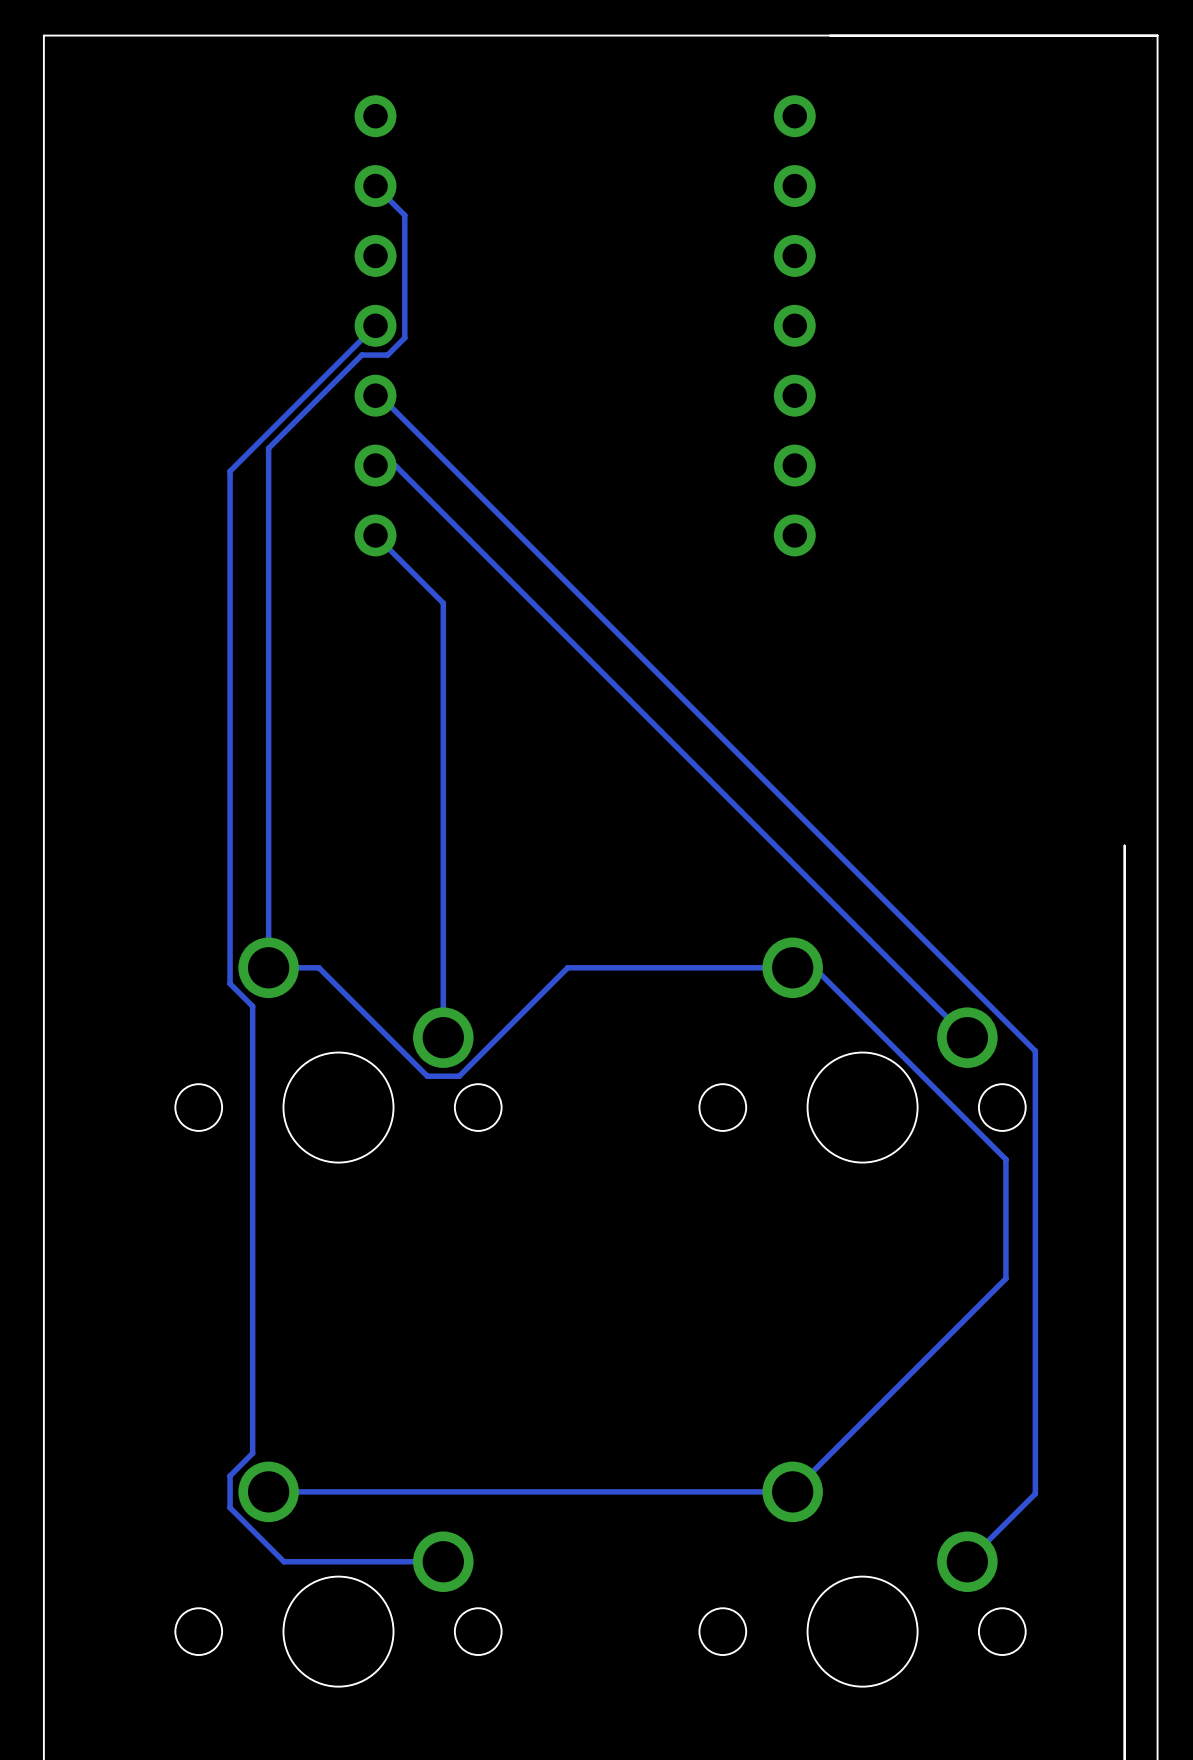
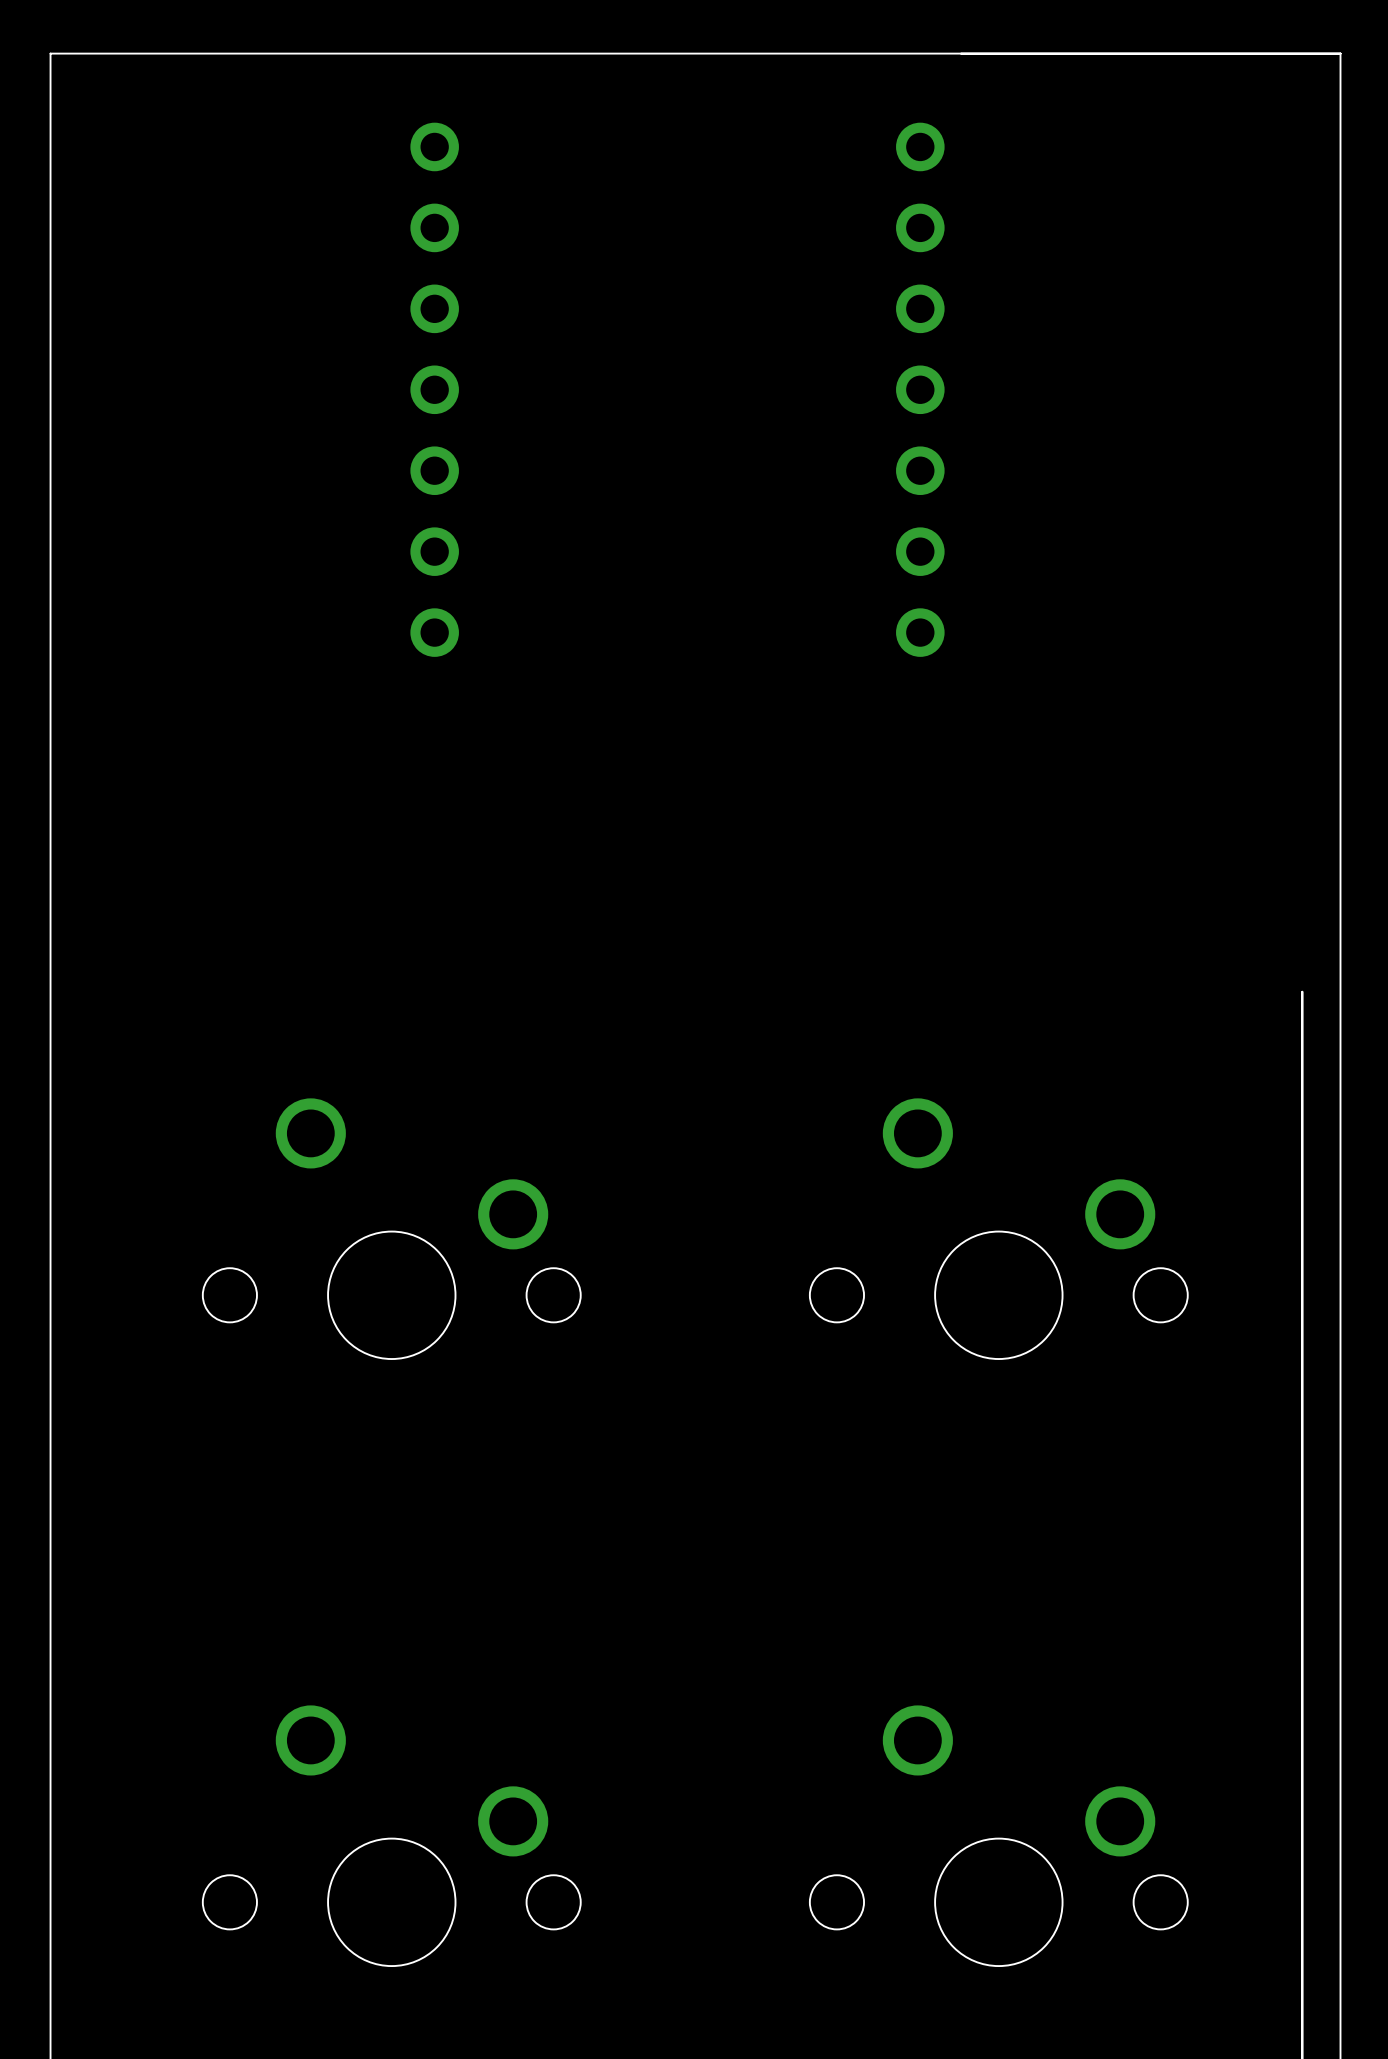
track: (375, 186) (404, 215) (404, 337) (387, 355) (361, 355) (268, 448) (268, 967) (318, 967) (427, 1076) (459, 1076) (567, 967) (814, 967) (1005, 1159) (1005, 1278) (792, 1491) (268, 1491) -> none
track: (375, 325) (230, 471) (230, 983) (252, 1006) (252, 1453) (230, 1475) (230, 1507) (283, 1561) (443, 1561) -> none
track: (375, 395) (379, 395) (1035, 1051) (1035, 1493) (967, 1561) -> none
track: (375, 465) (395, 465) (967, 1037) -> none
track: (375, 535) (443, 603) (443, 1037) -> none

